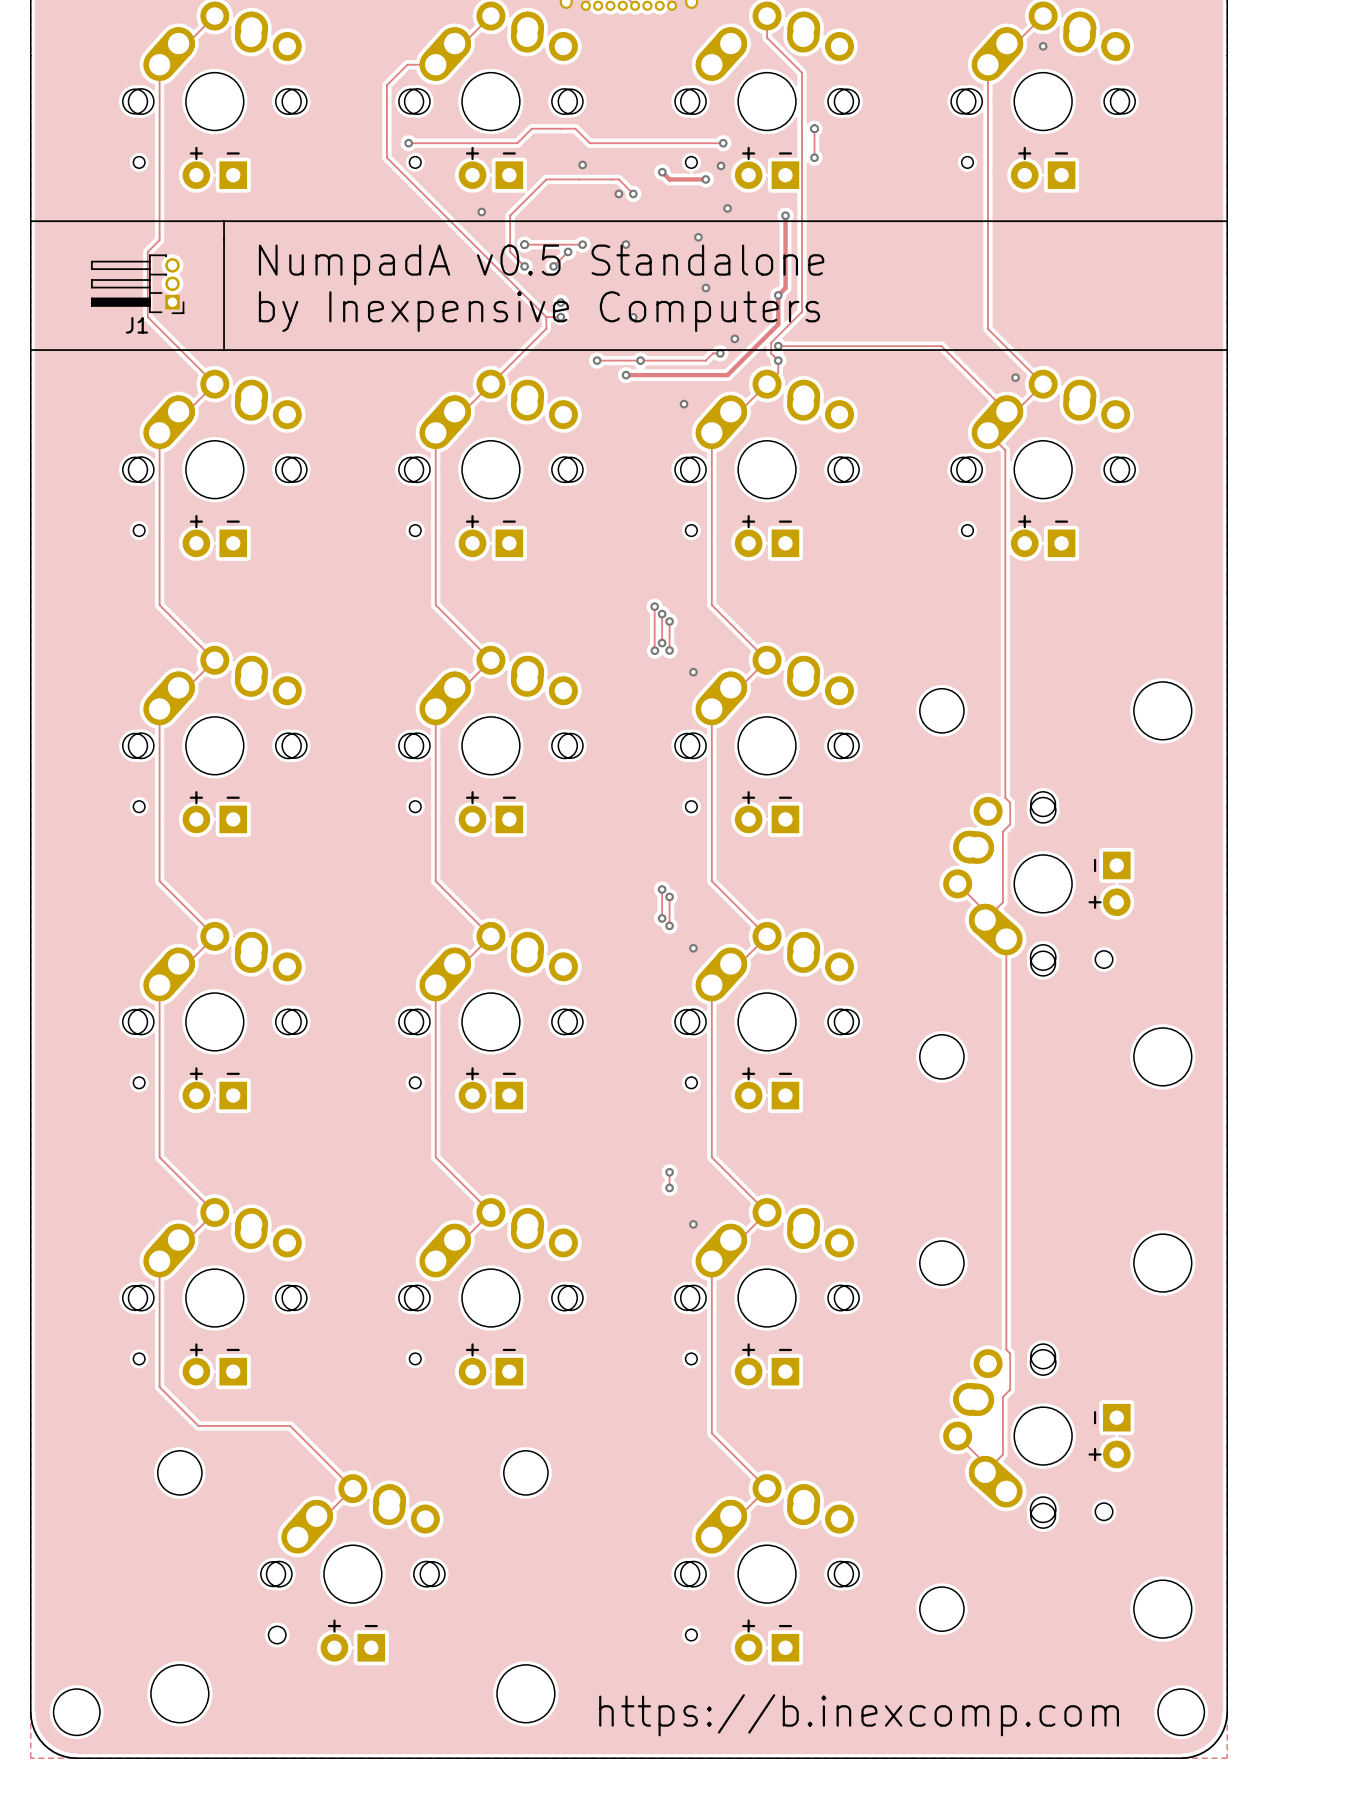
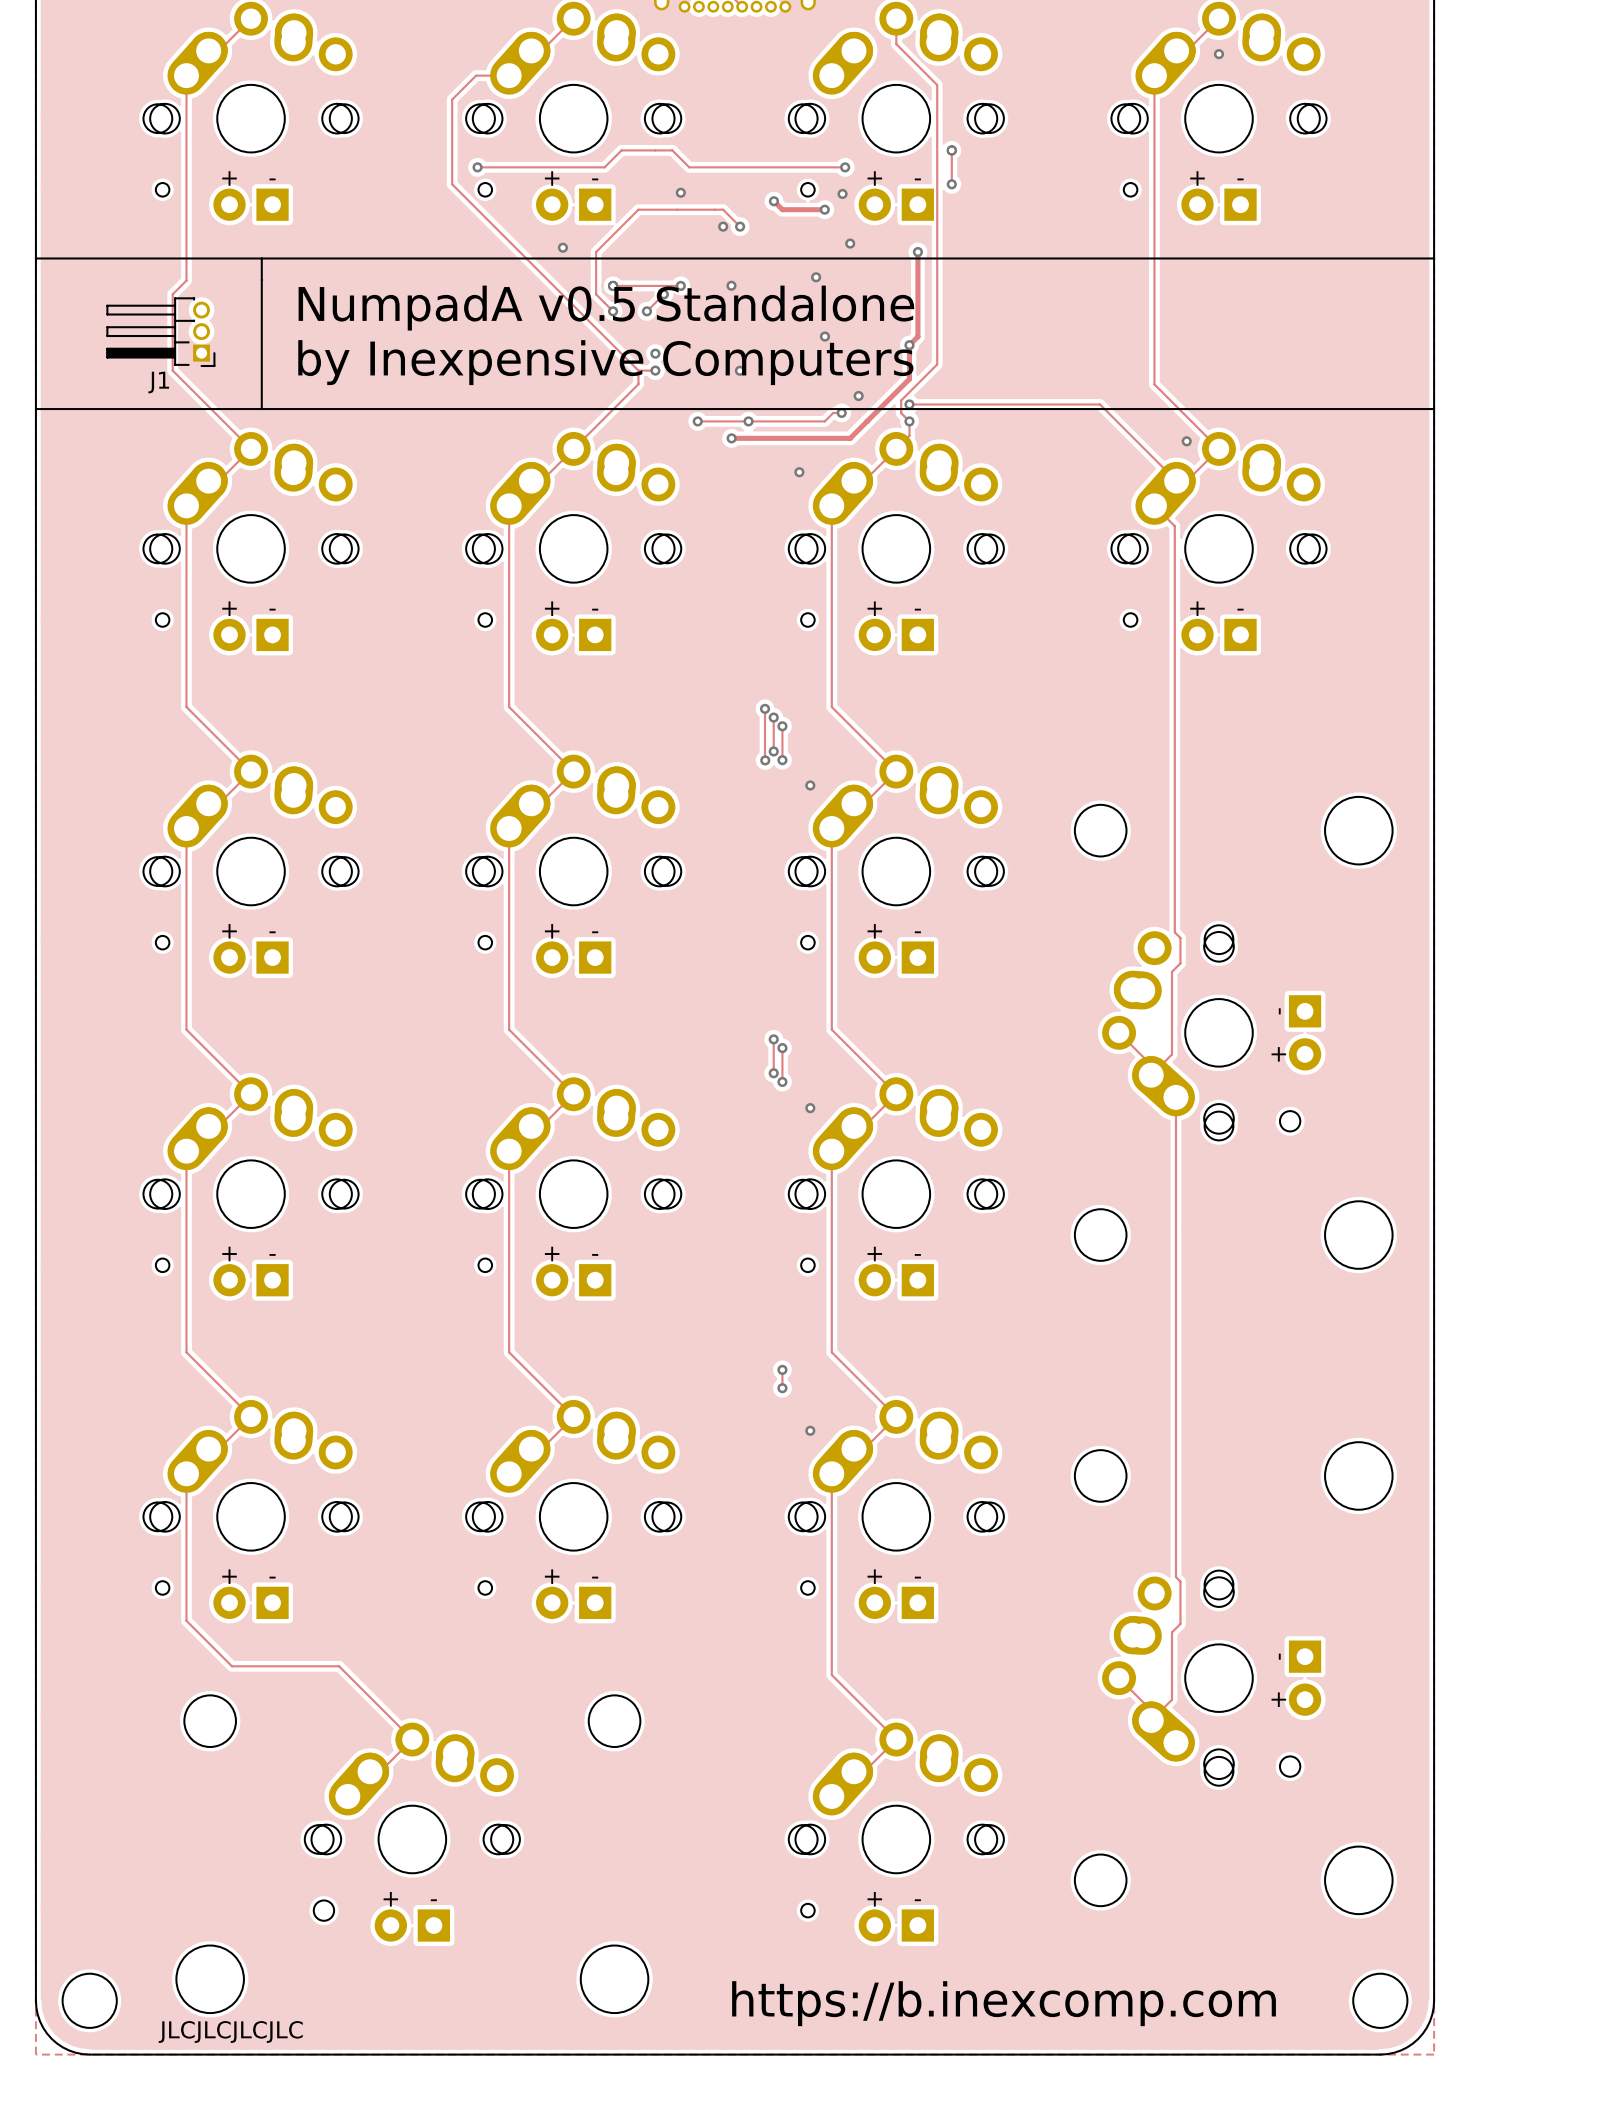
text: none -> JLCJLCJLCJLC (230, 2031)

